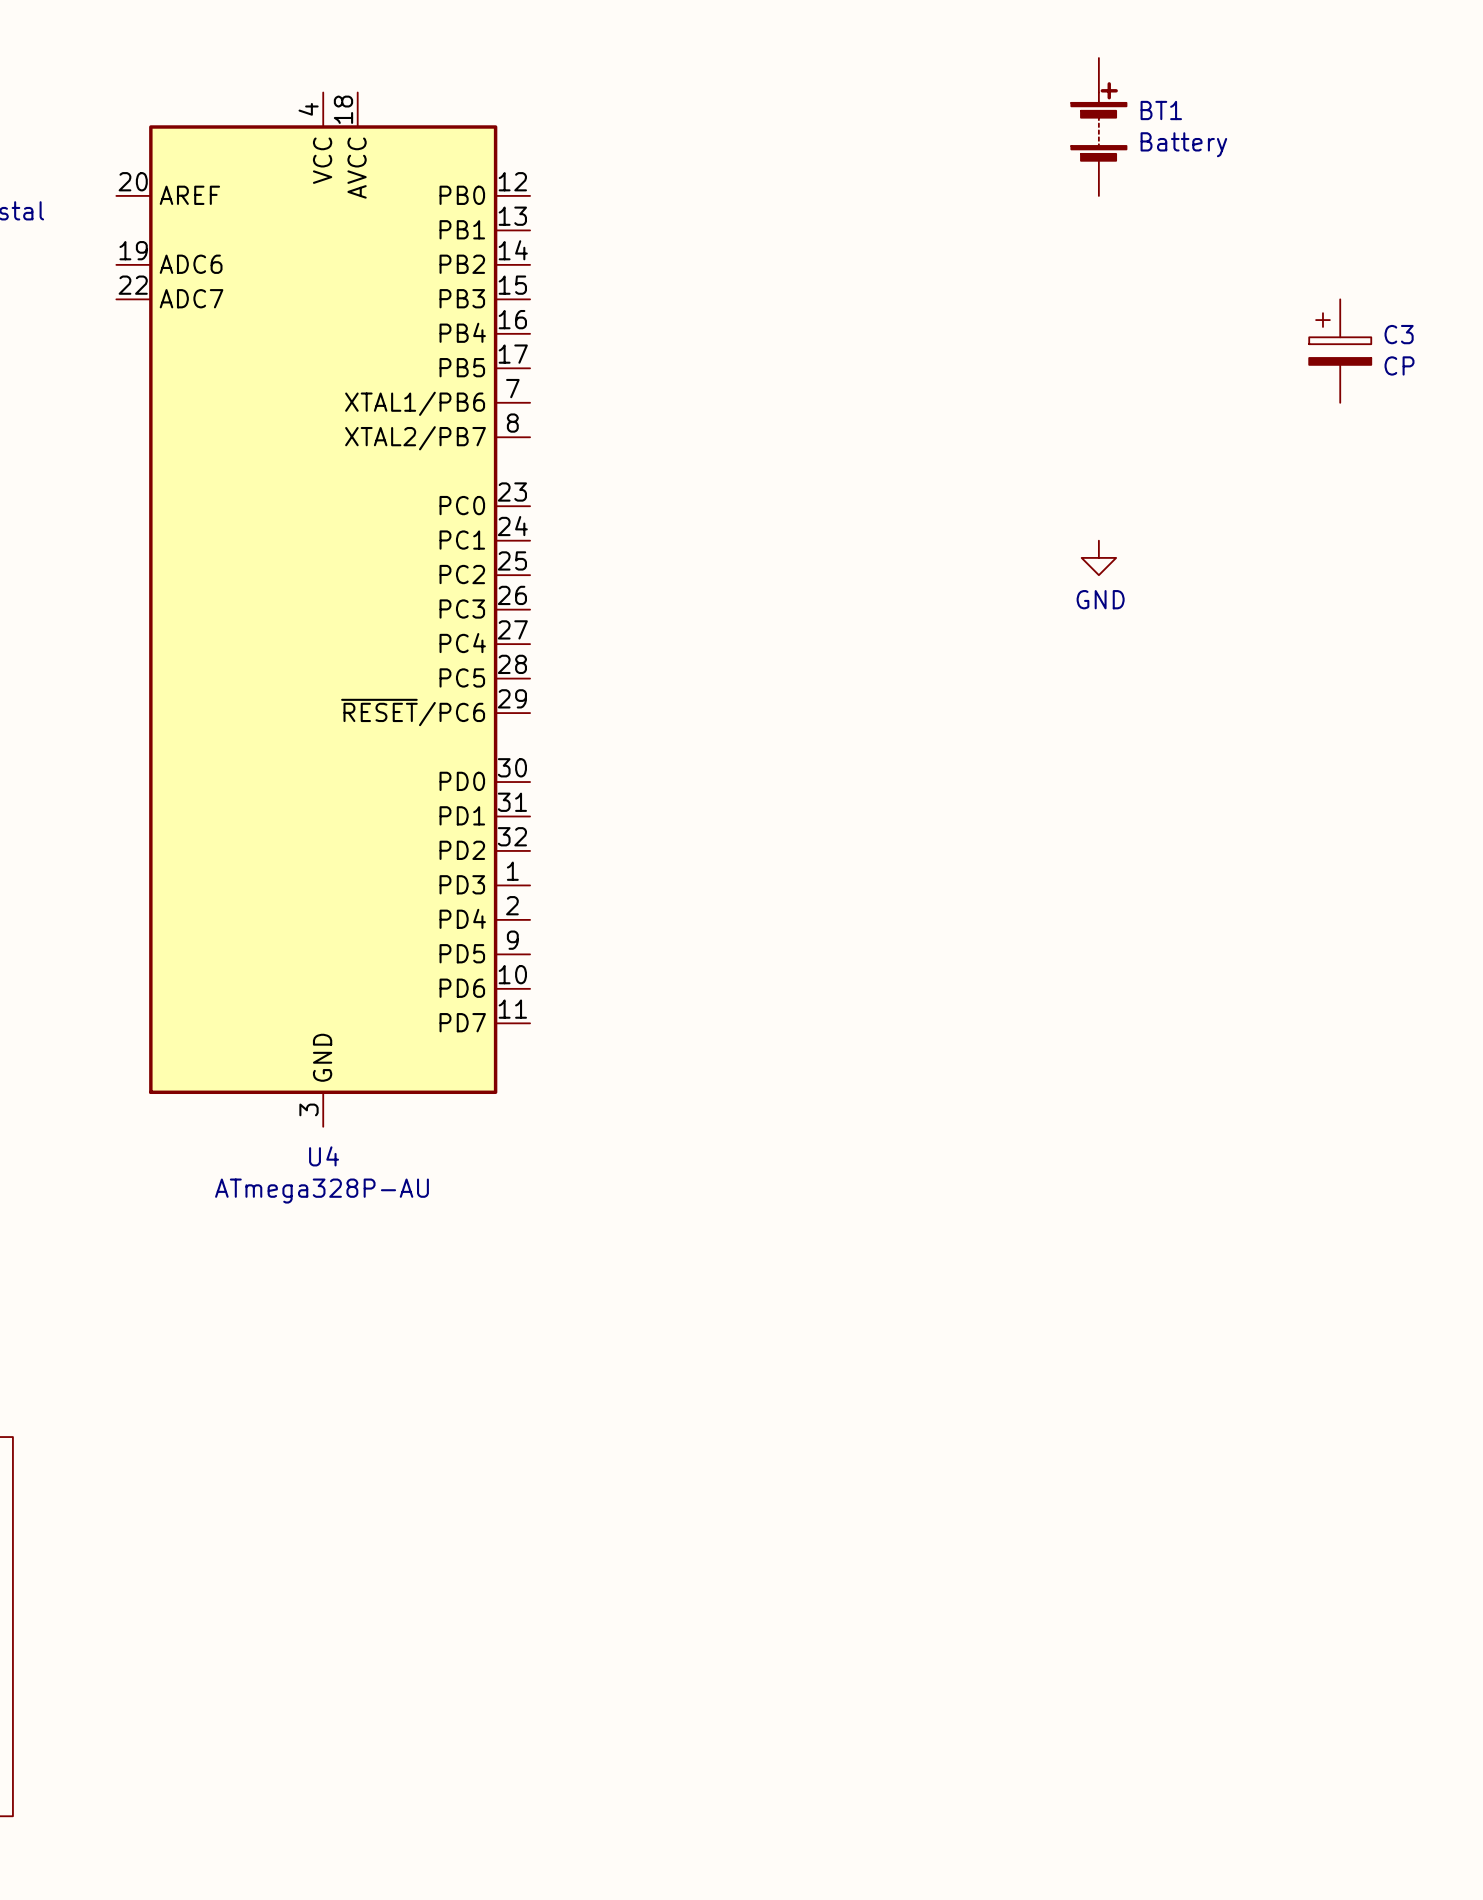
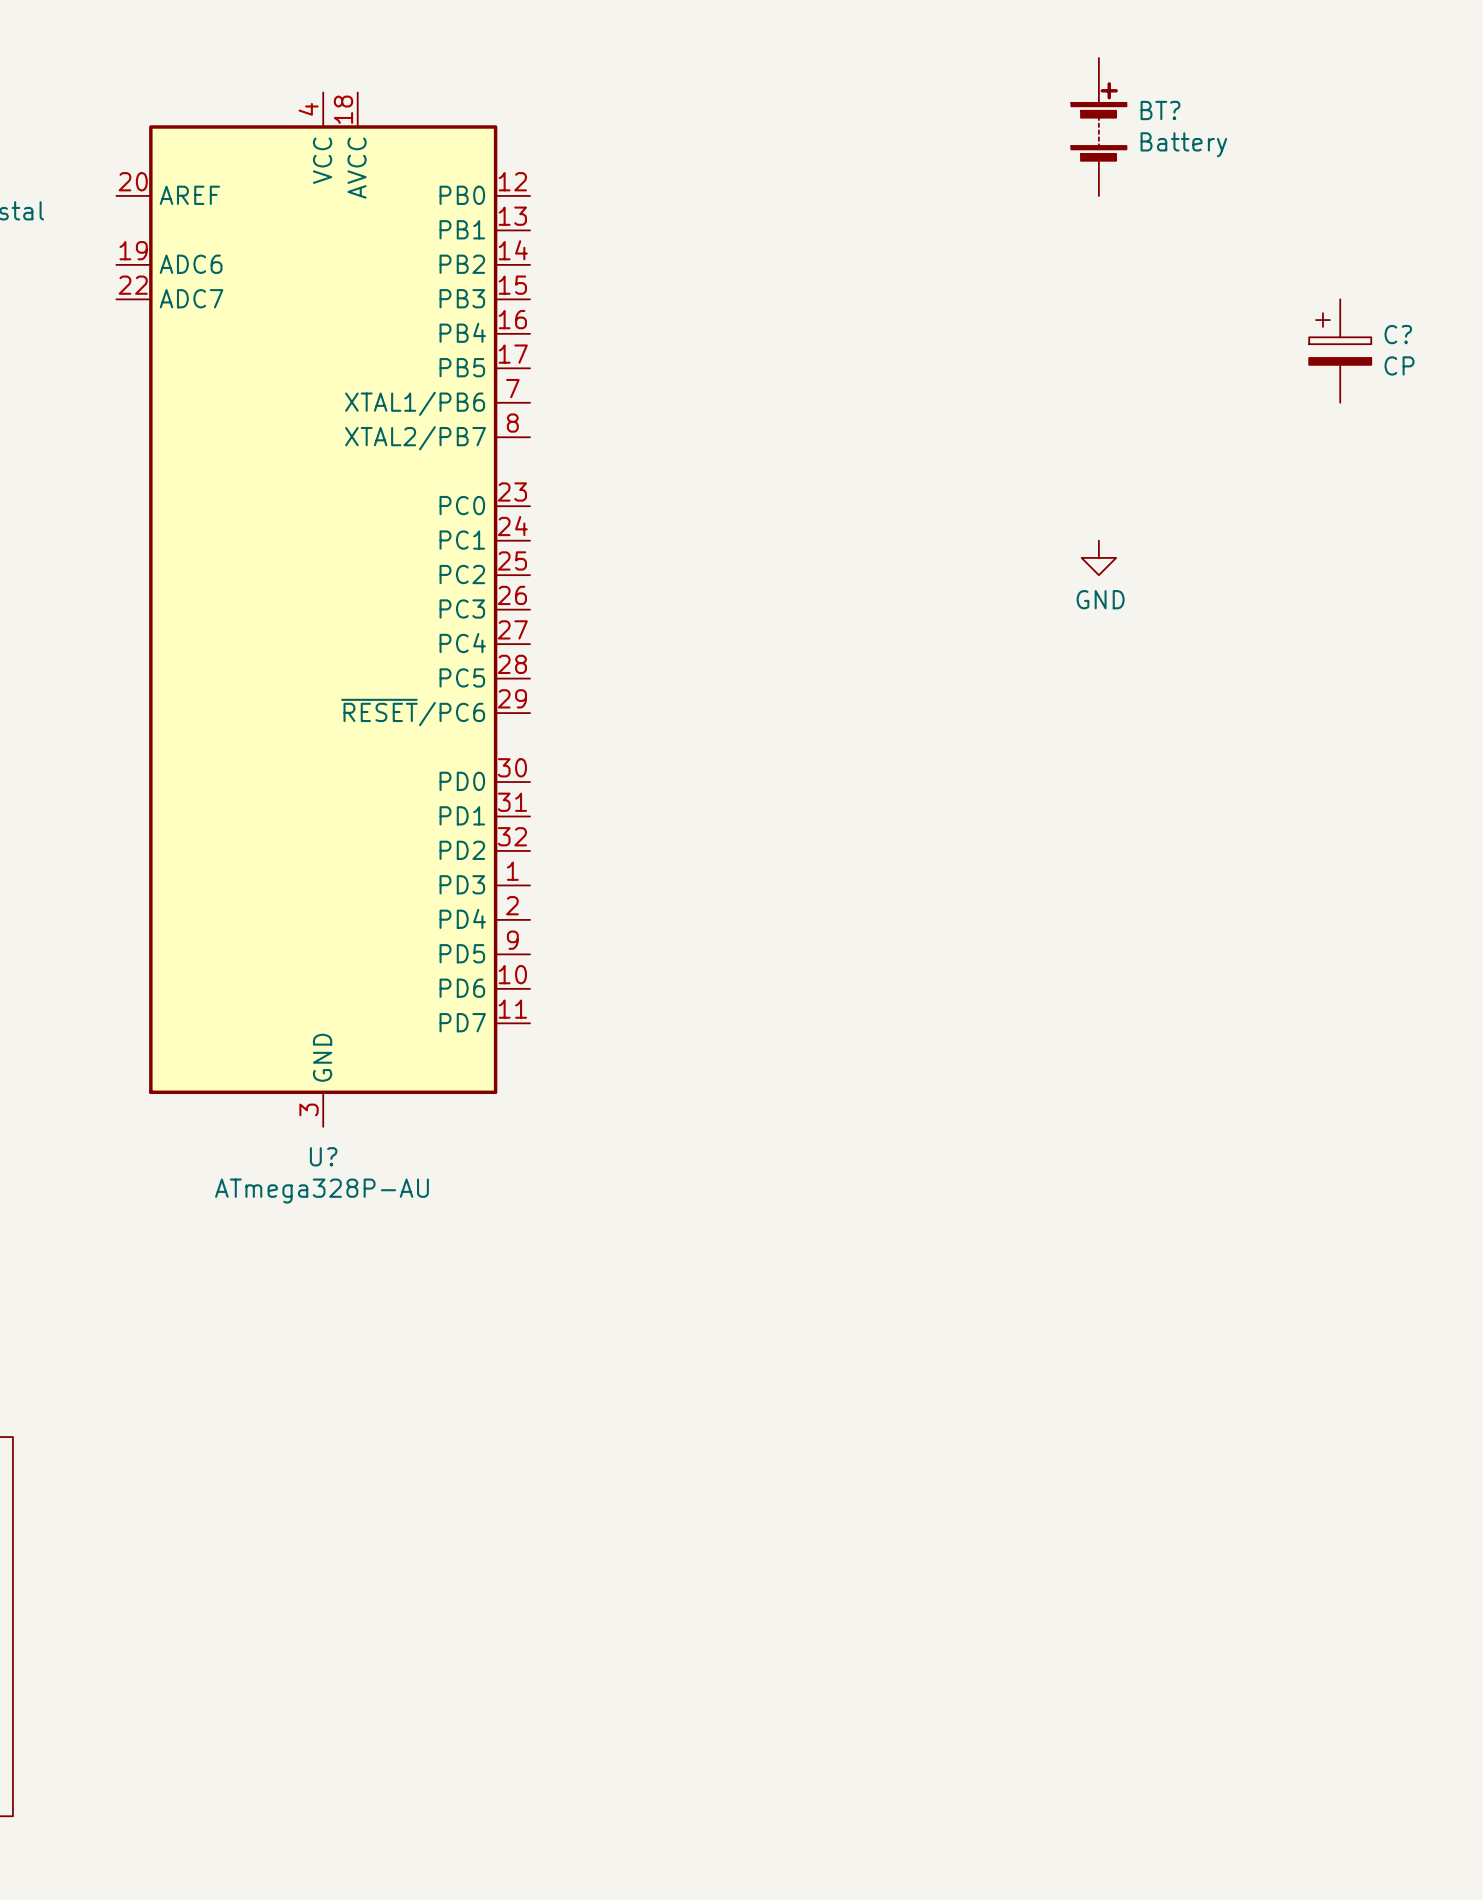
BT1 name: BT1 (1161, 110) -> BT? (1160, 110)
C3 name: C3 (1399, 334) -> C? (1398, 334)
U4 name: U4 (324, 1156) -> U? (323, 1156)

